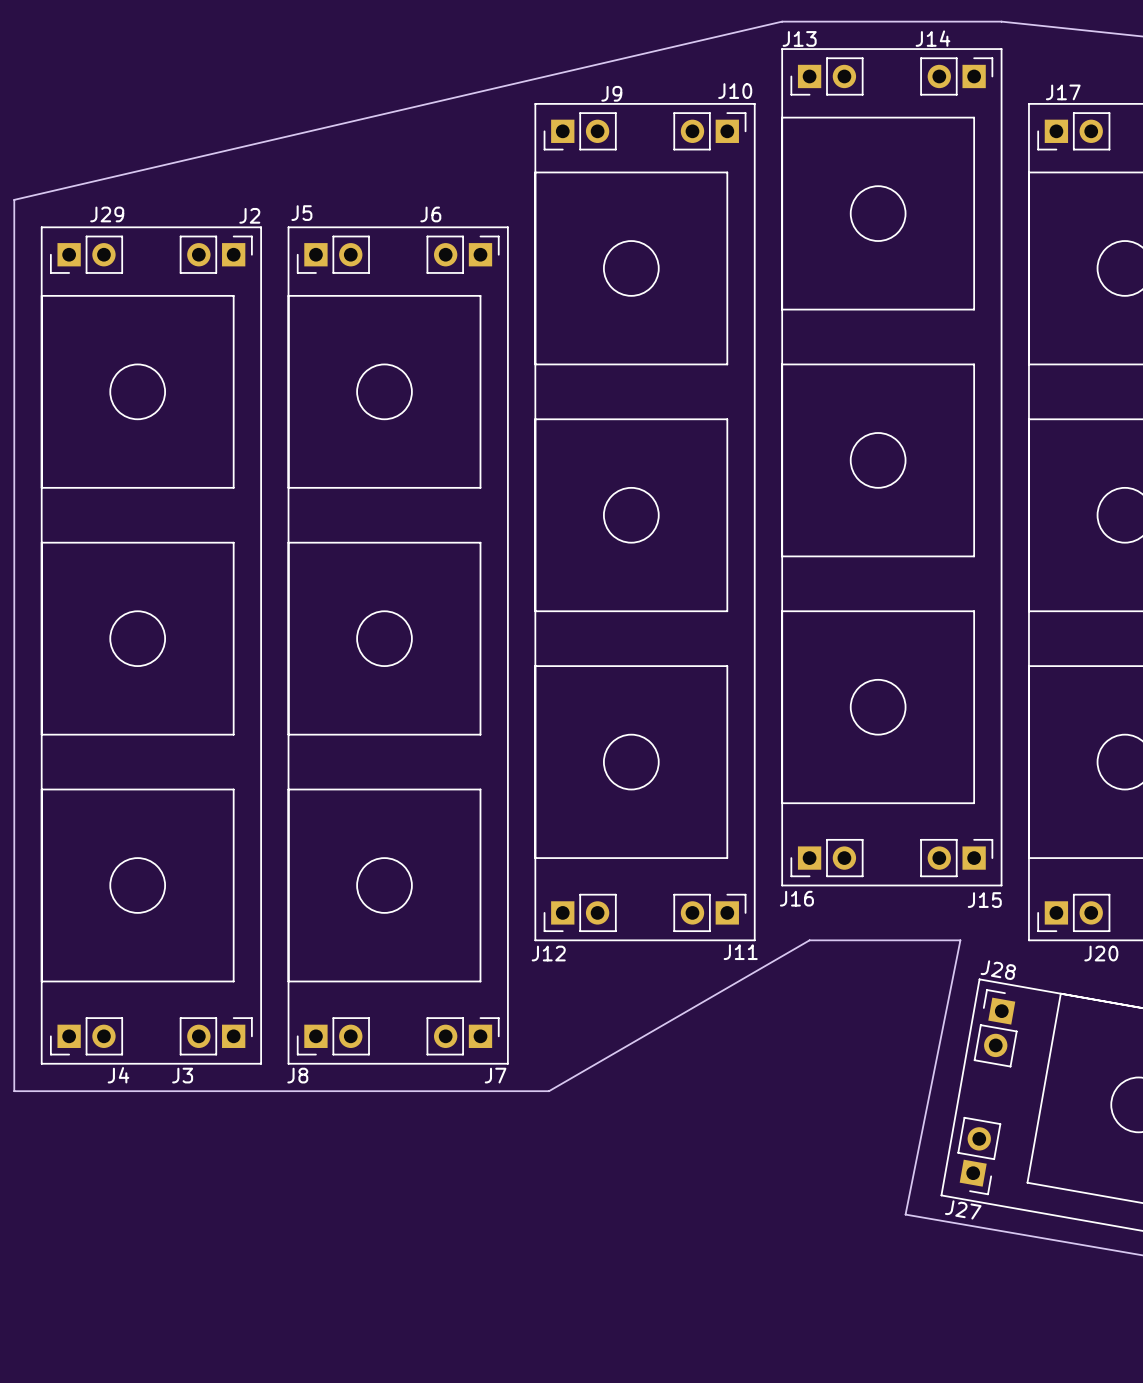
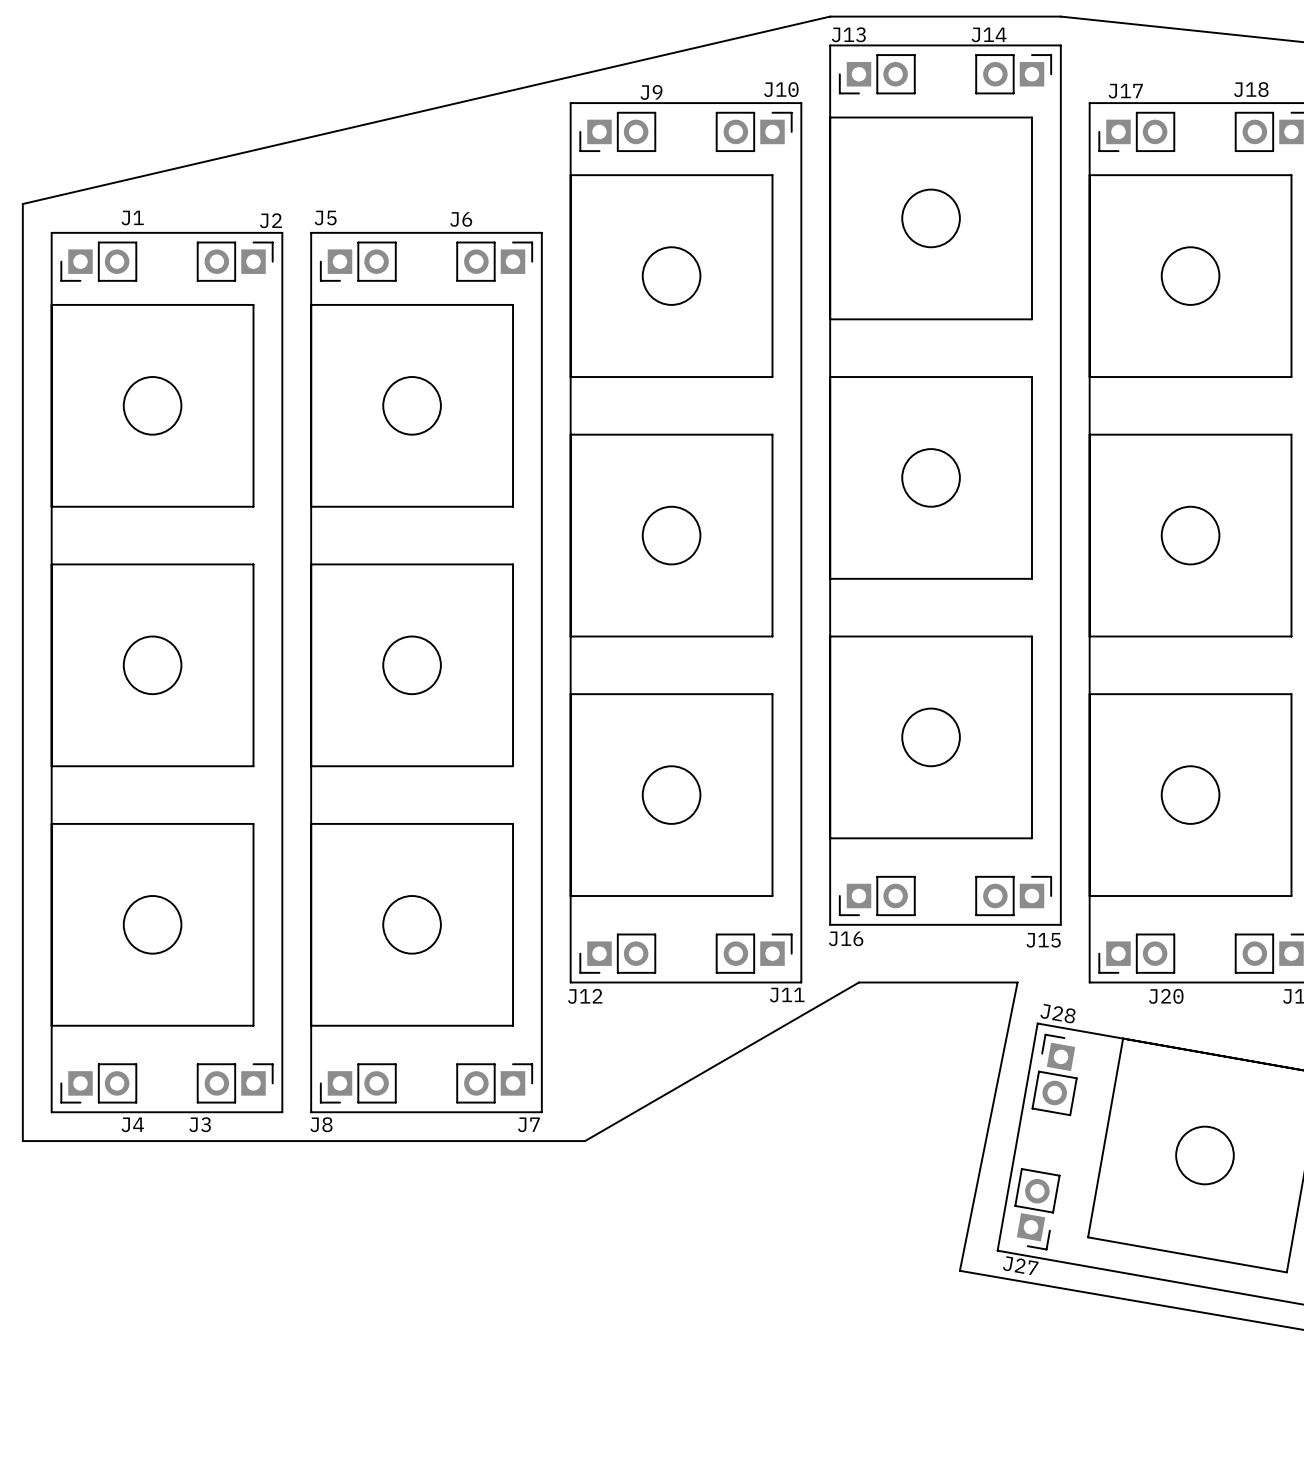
J29 name: J29 (107, 214) -> J1 (132, 218)

